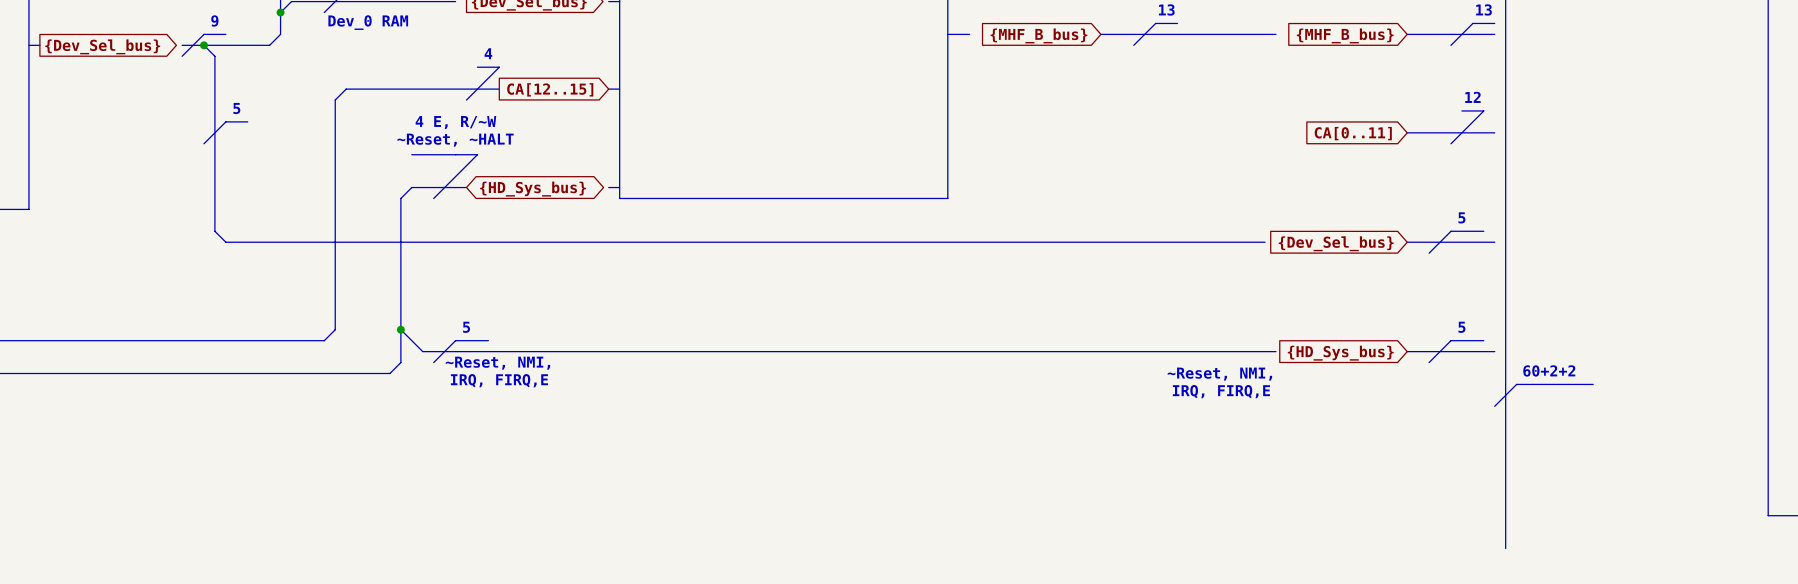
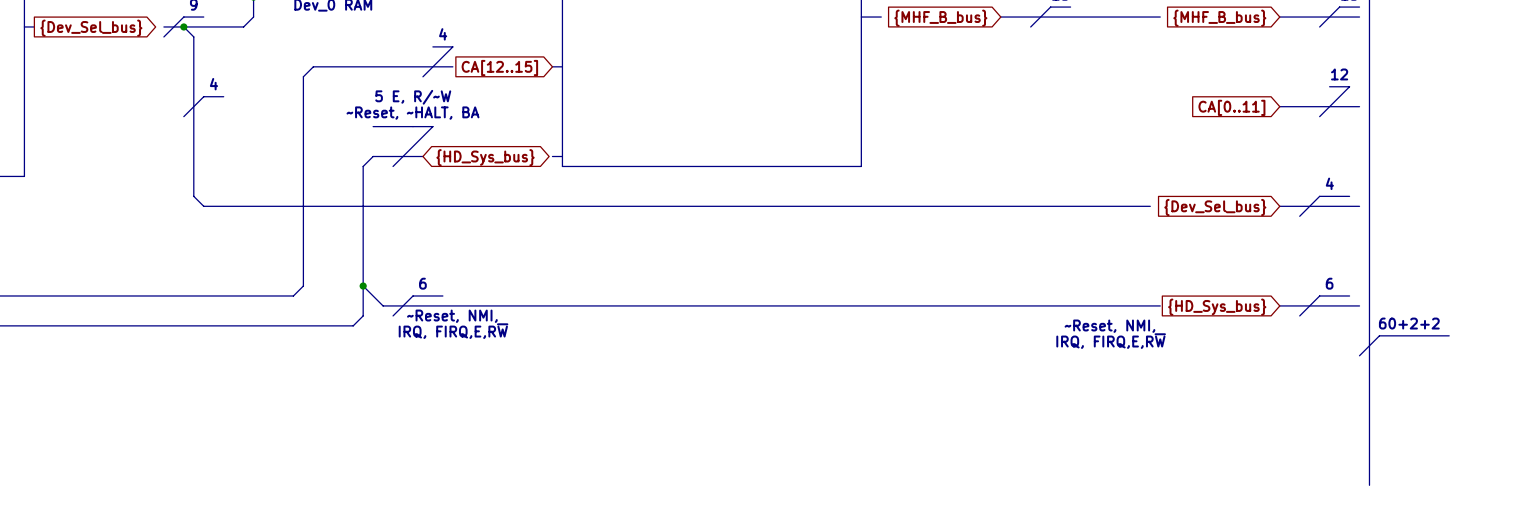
text: 5 (236, 108) -> 4 (213, 84)
text: 4 E, R/~W (455, 122) -> 5 E, R/~W (413, 97)
text: ~Reset, ~HALT (455, 140) -> ~Reset, ~HALT, BA (412, 113)
text: 5 (1461, 217) -> 4 (1329, 183)
text: 5 (466, 327) -> 6 (422, 283)
text: 5 (1461, 327) -> 6 (1329, 283)
text: IRQ, FIRQ,E (499, 380) -> IRQ, FIRQ,E,R~{W} (453, 331)
text: IRQ, FIRQ,E (1221, 391) -> IRQ, FIRQ,E,R~{W} (1111, 341)

